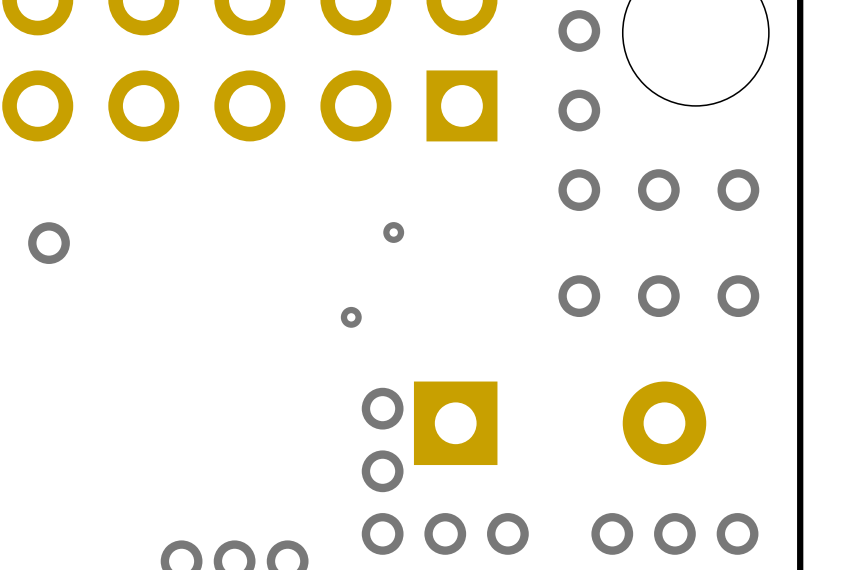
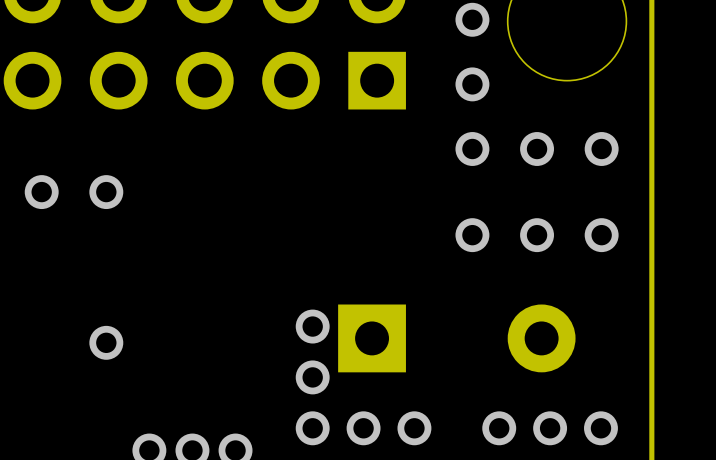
via: (393, 232) -> none
via: none -> (106, 192)
via: (351, 317) -> none
via: none -> (106, 342)

